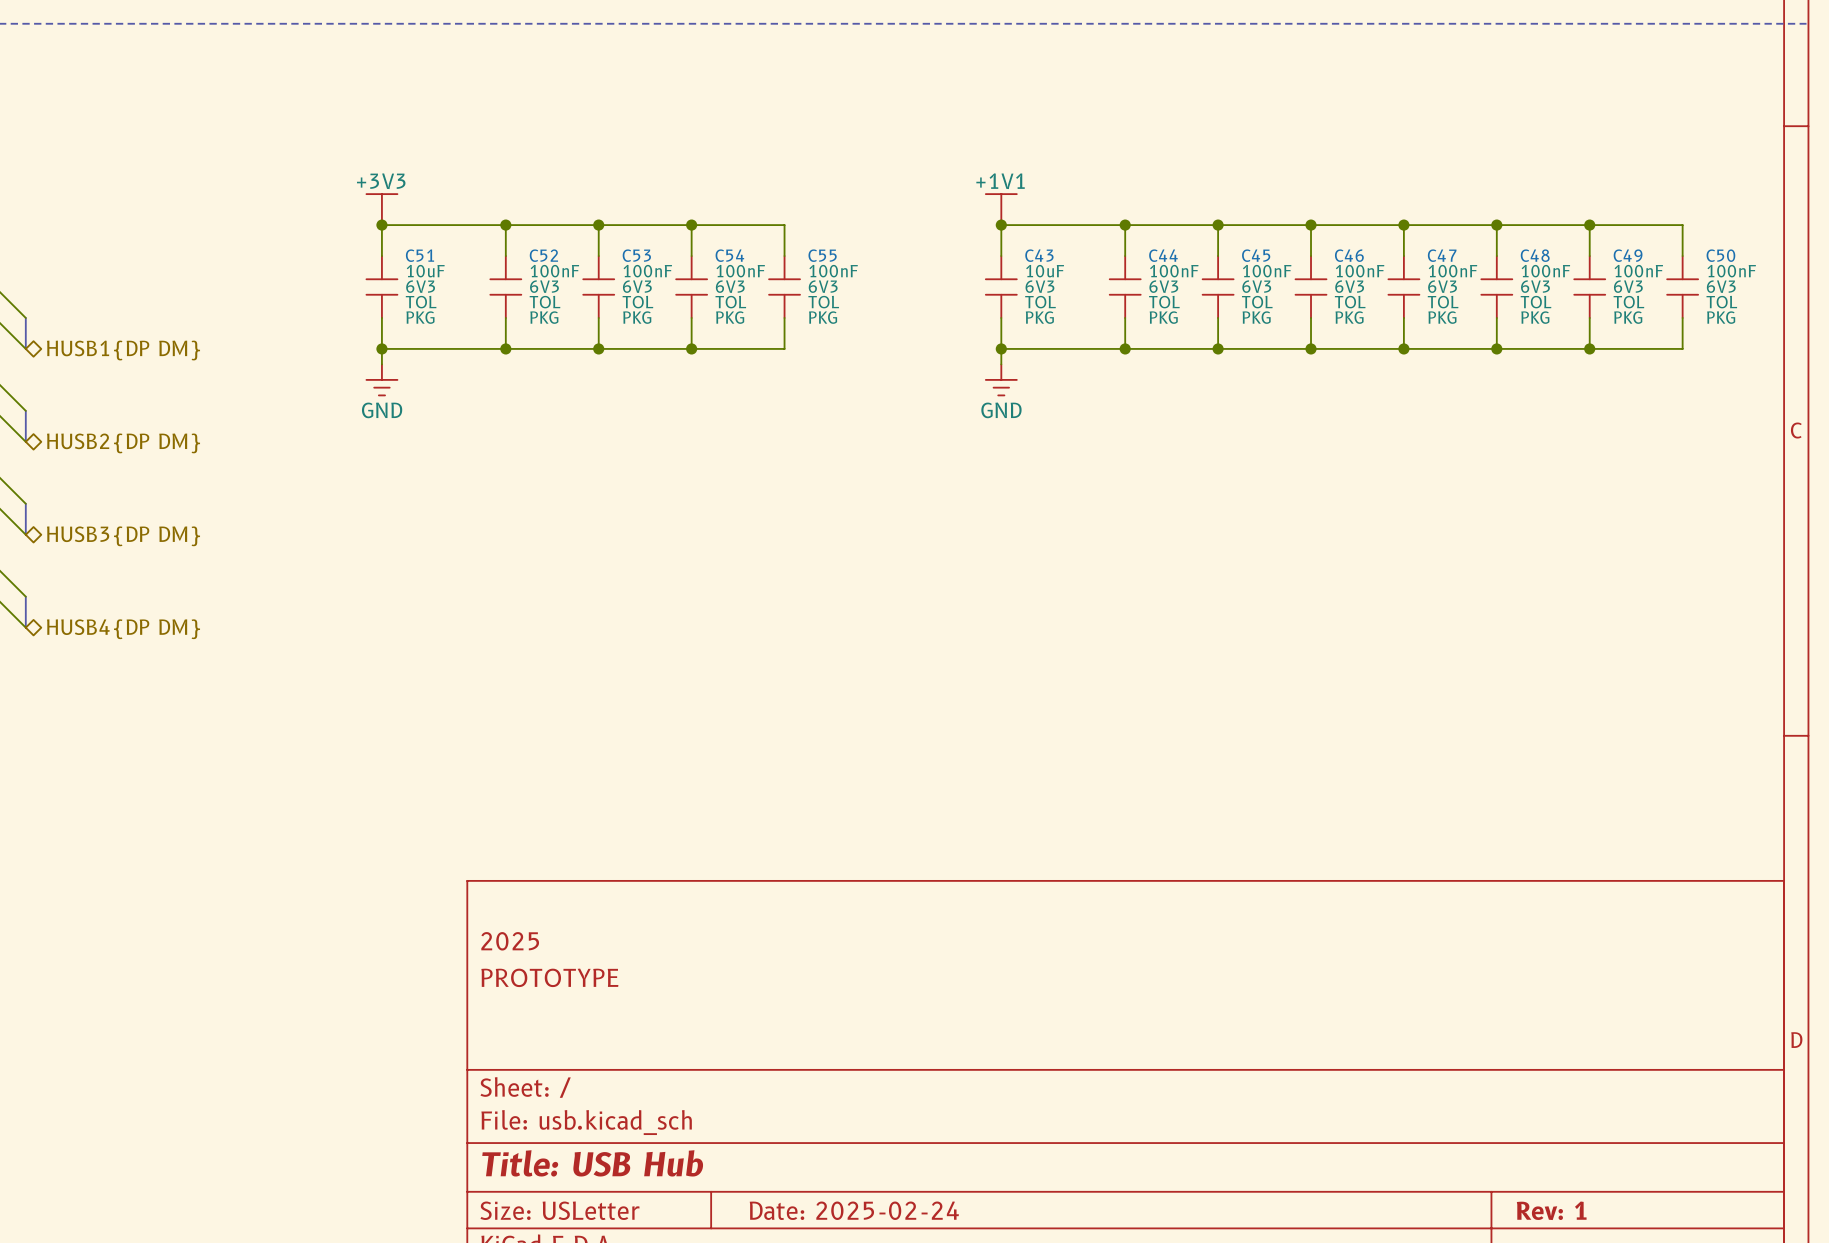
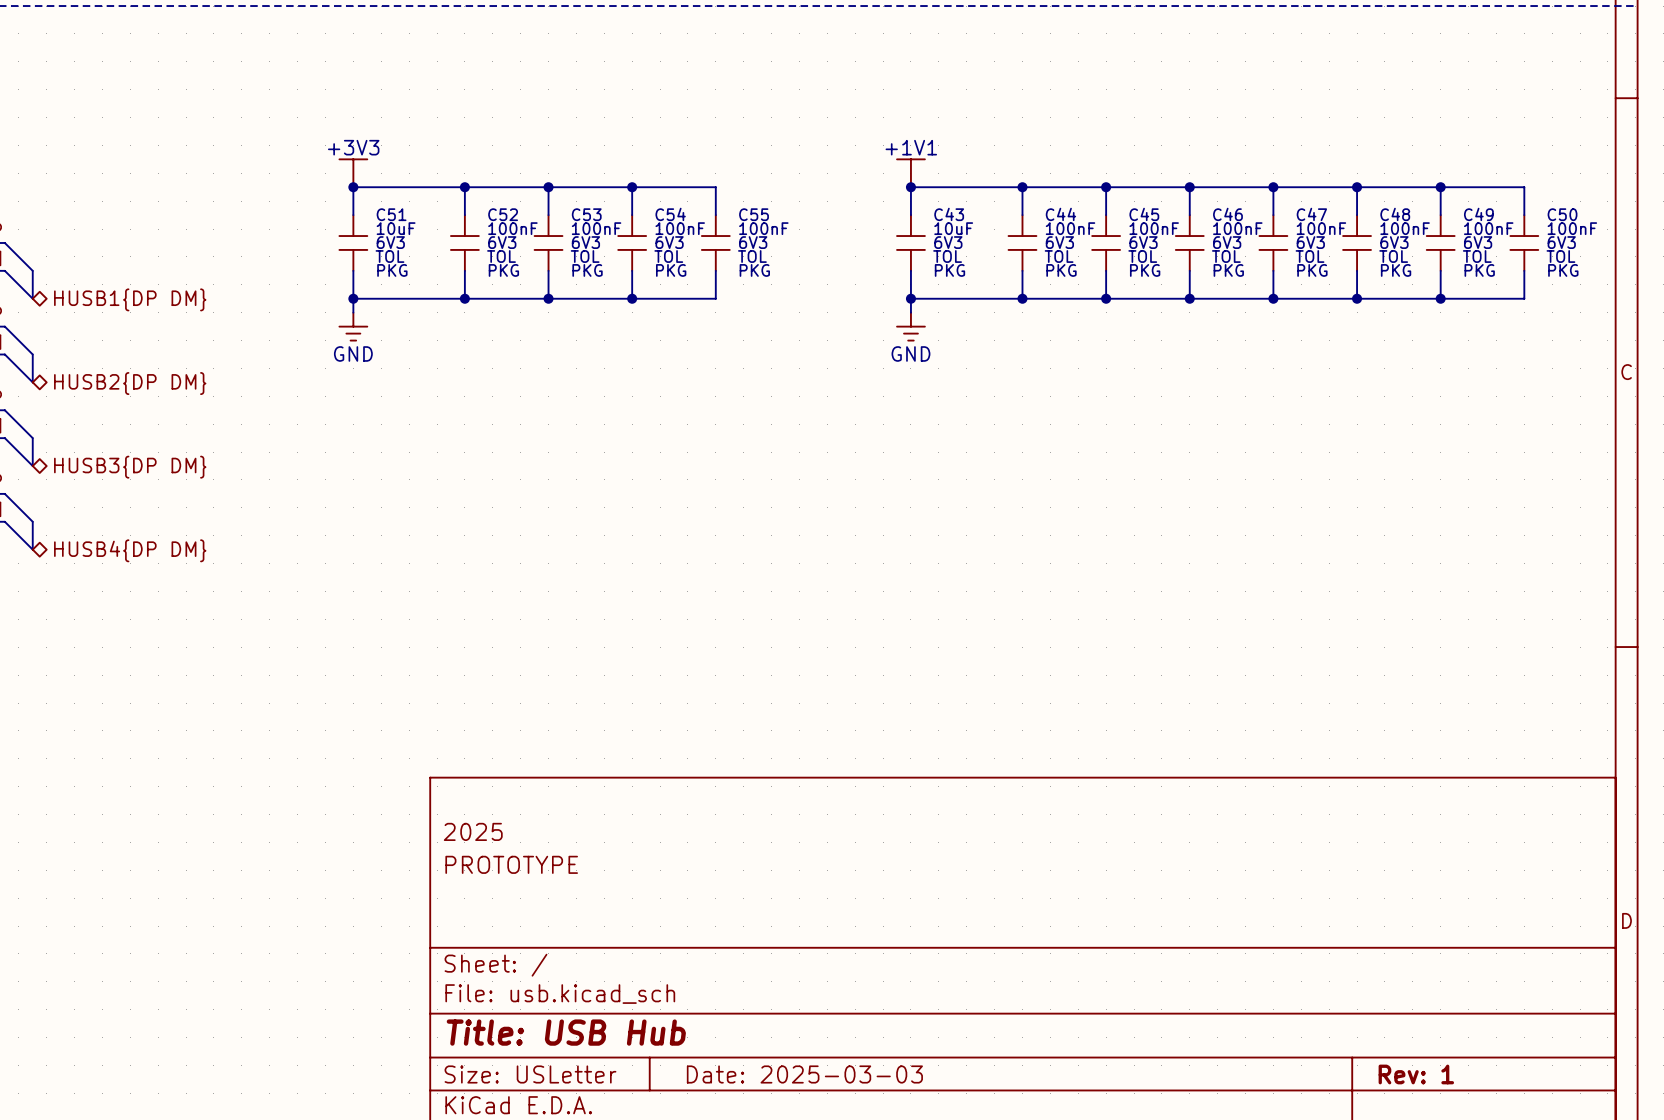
title block: Date: 2025-02-24 (854, 1210) -> Date: 2025-03-03 (804, 1074)

